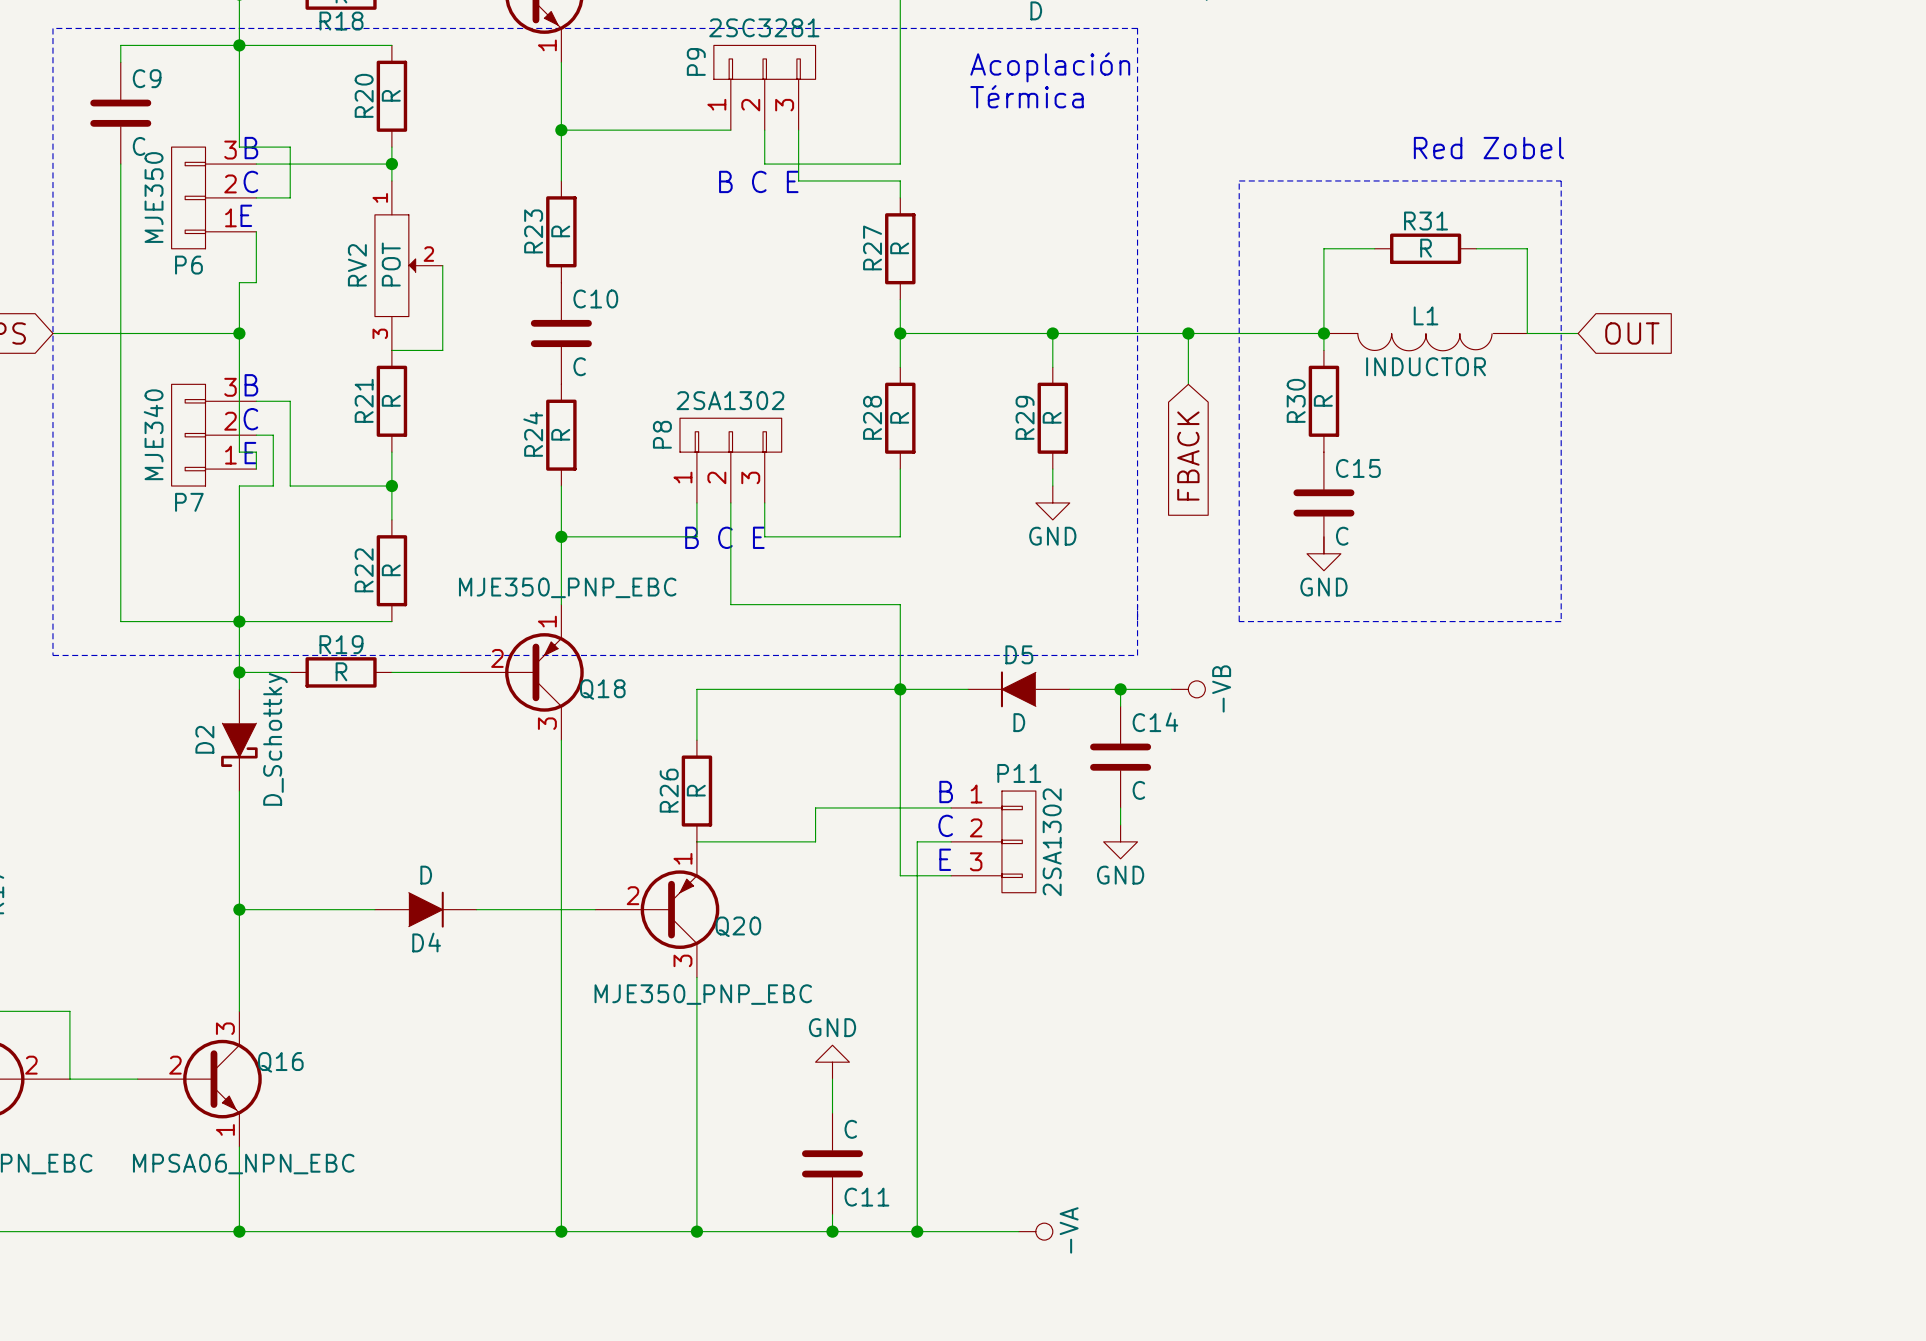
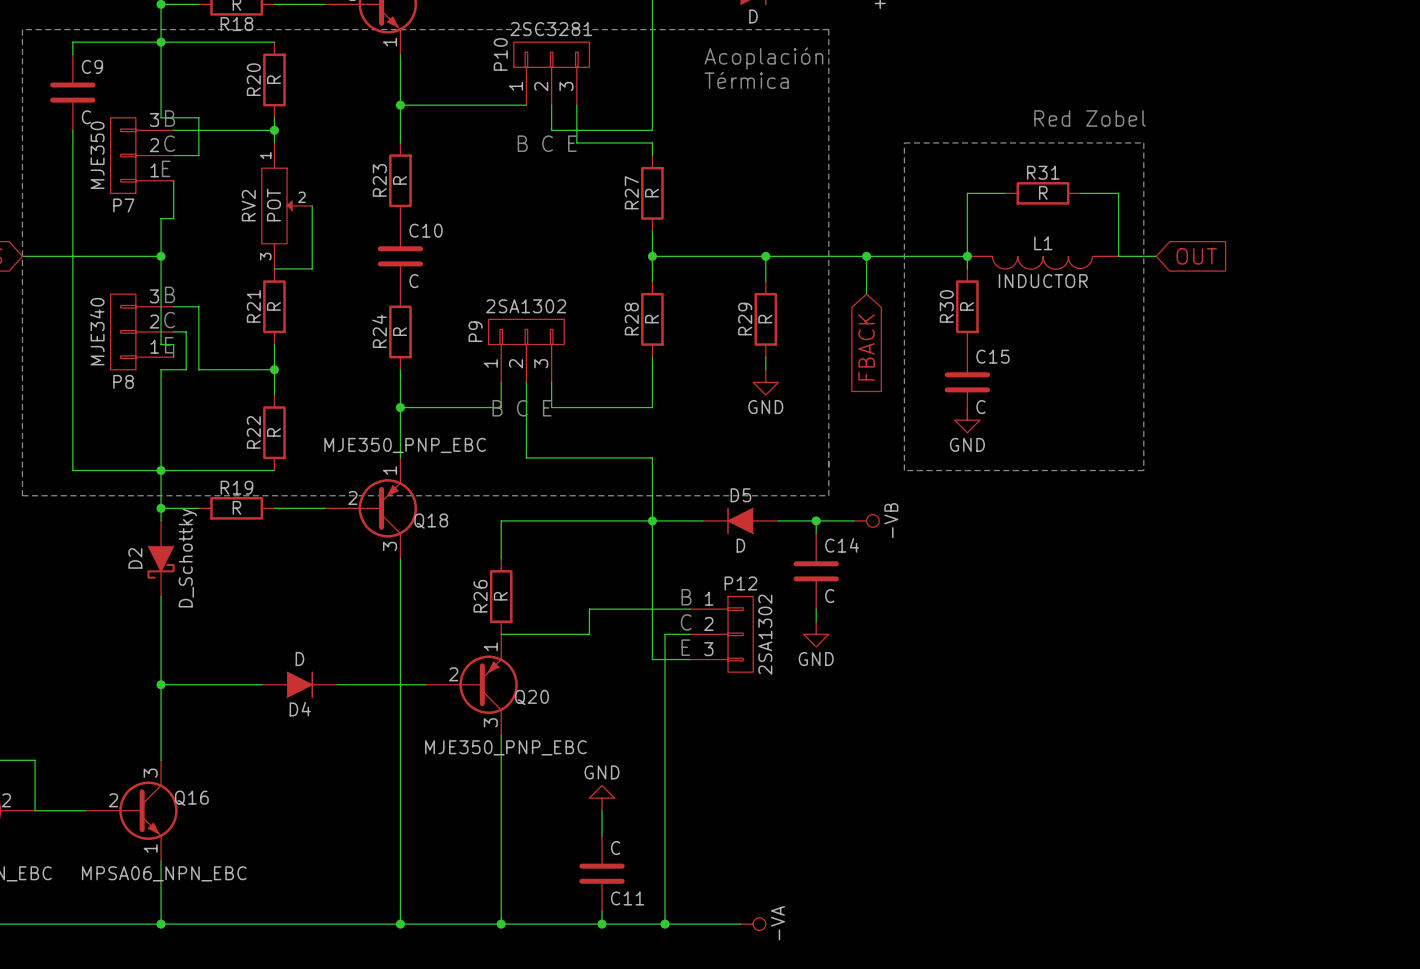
P9 name: P9 (696, 61) -> P10 (500, 54)
P6 name: P6 (188, 265) -> P7 (123, 205)
P8 name: P8 (662, 434) -> P9 (475, 331)
P7 name: P7 (189, 502) -> P8 (123, 381)
P11 name: P11 (1019, 773) -> P12 (740, 583)

